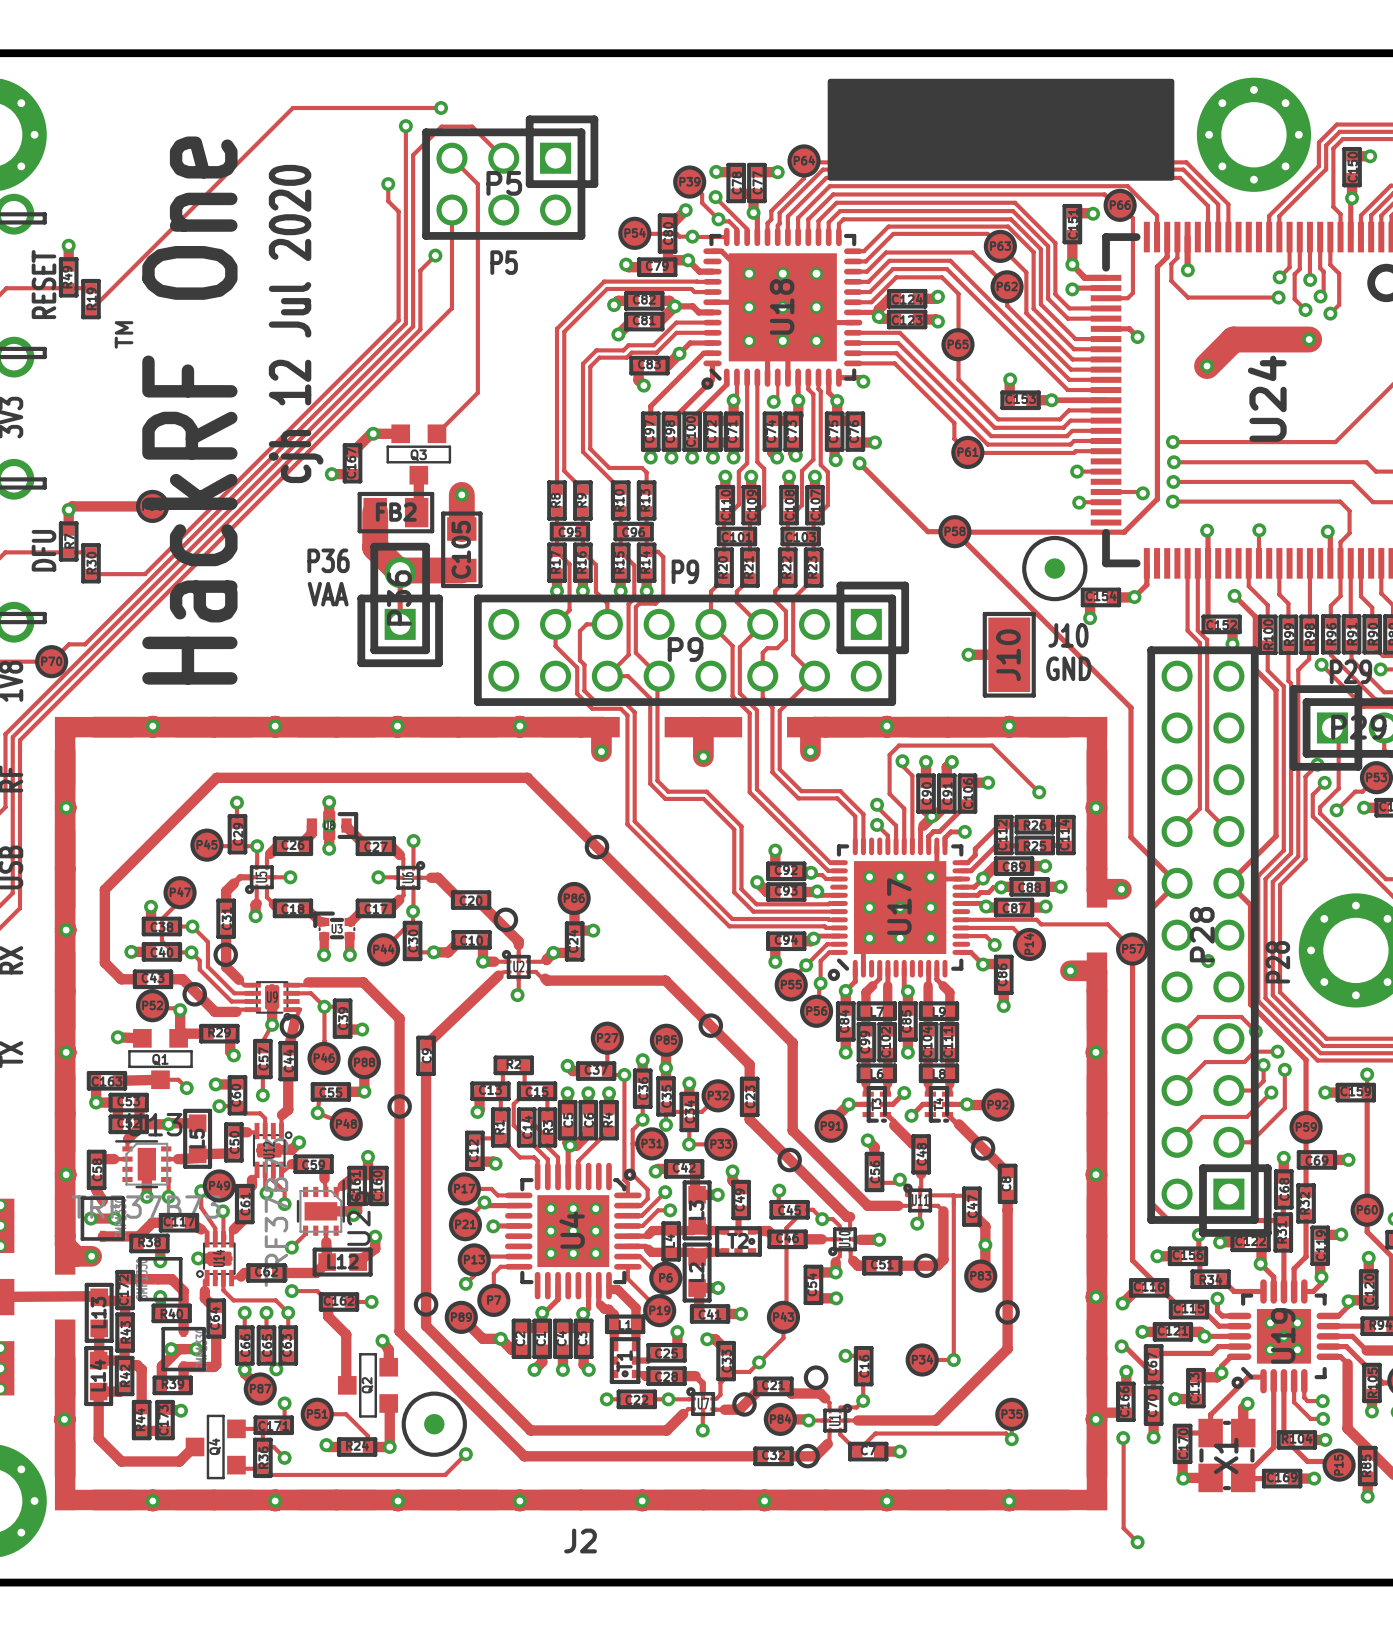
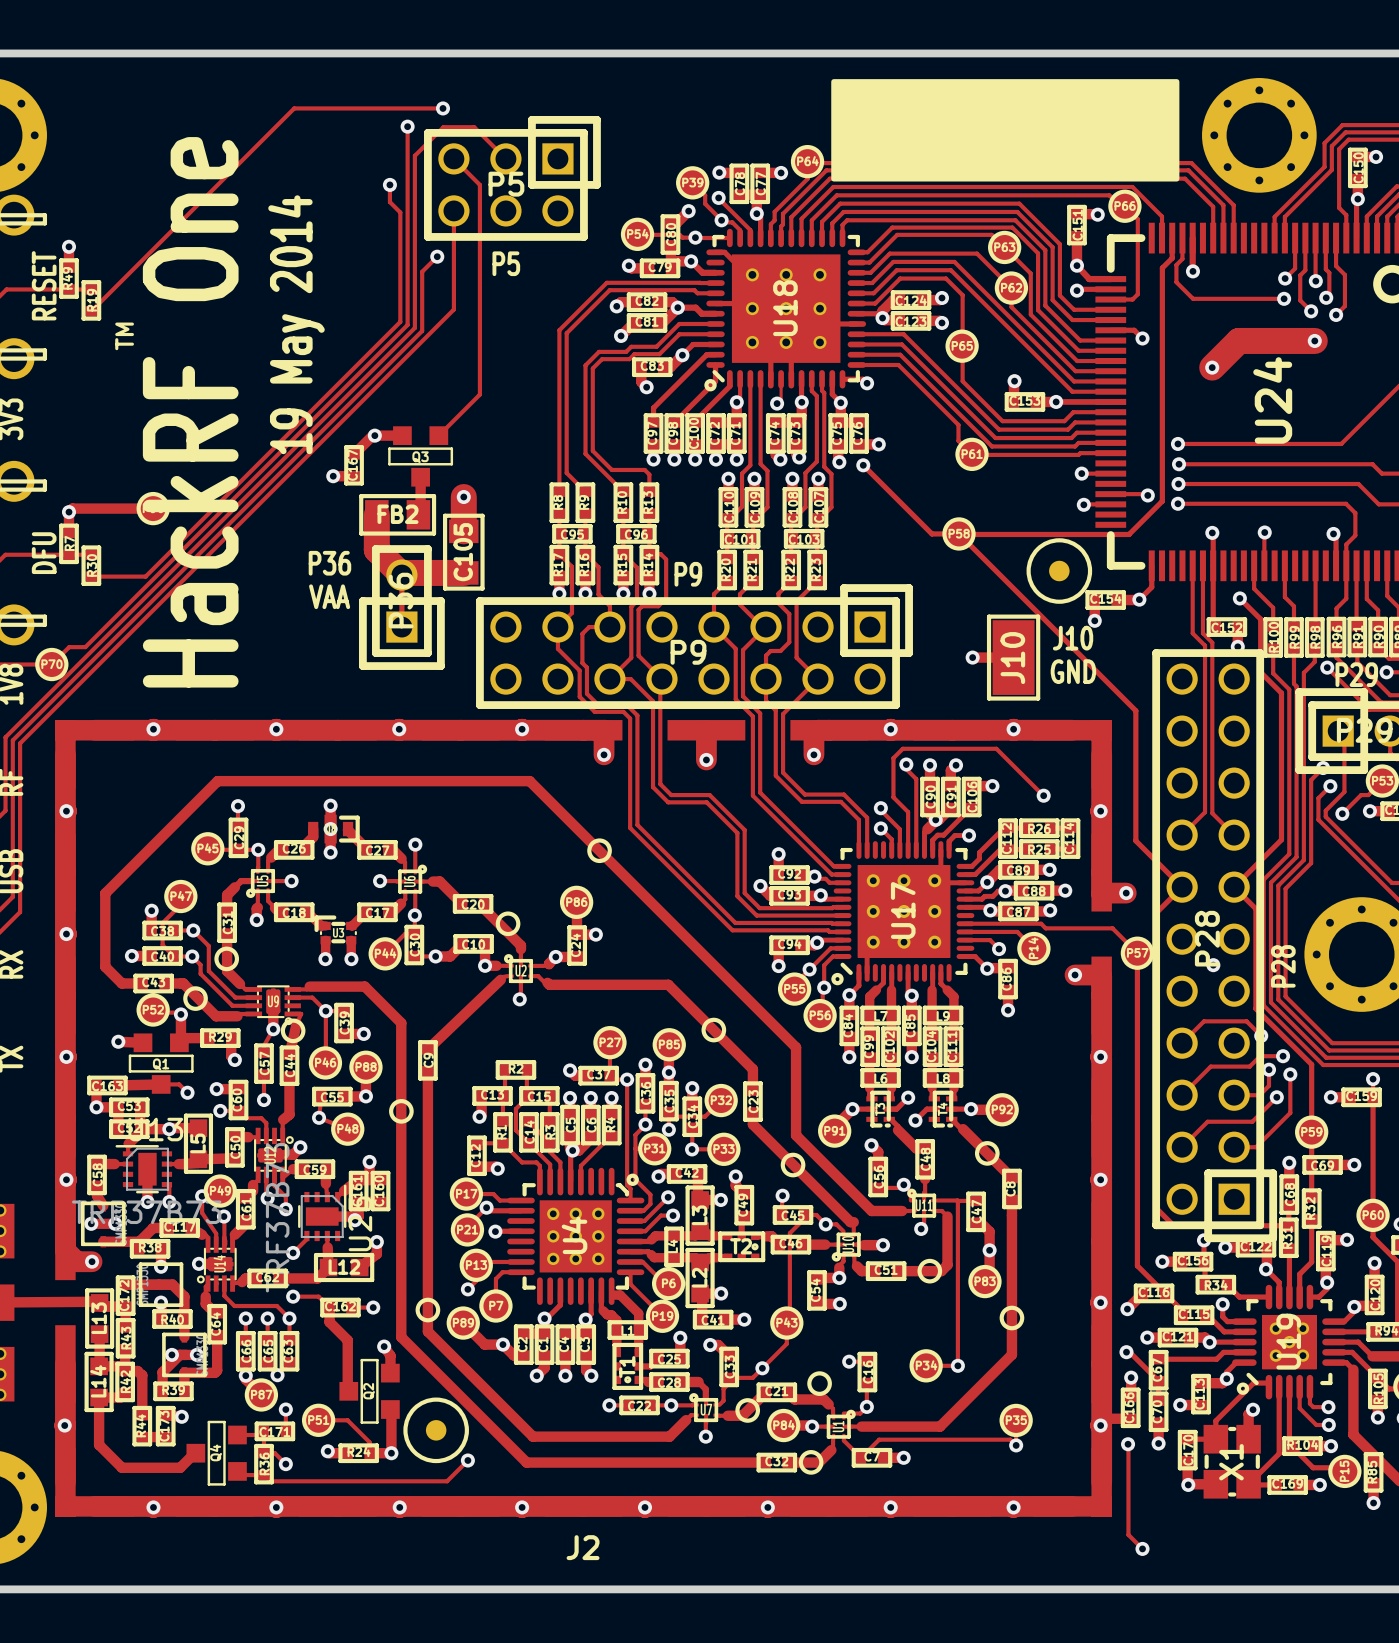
text: cjh 12 Jul 2020 (296, 323) -> 19 May 2014 (296, 324)

